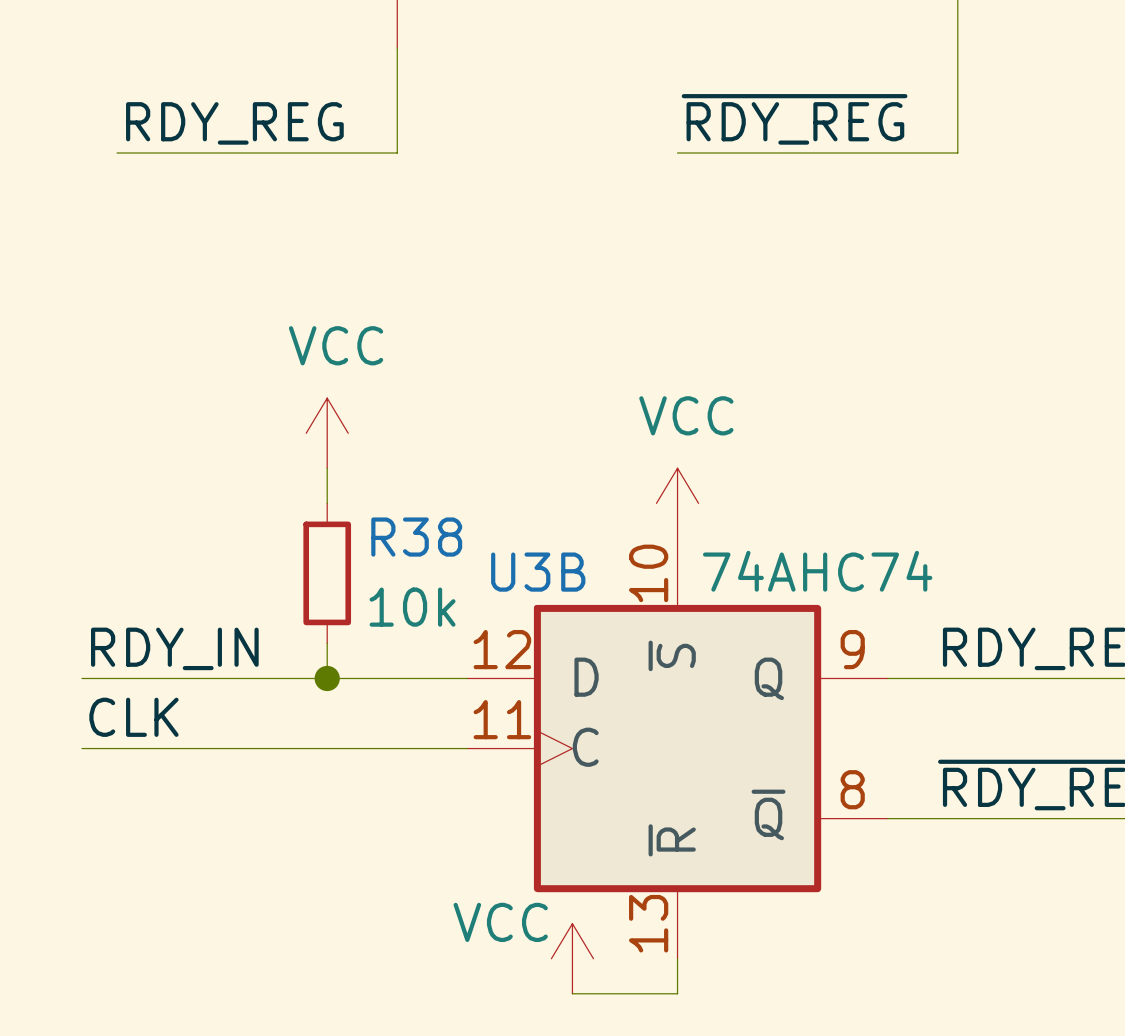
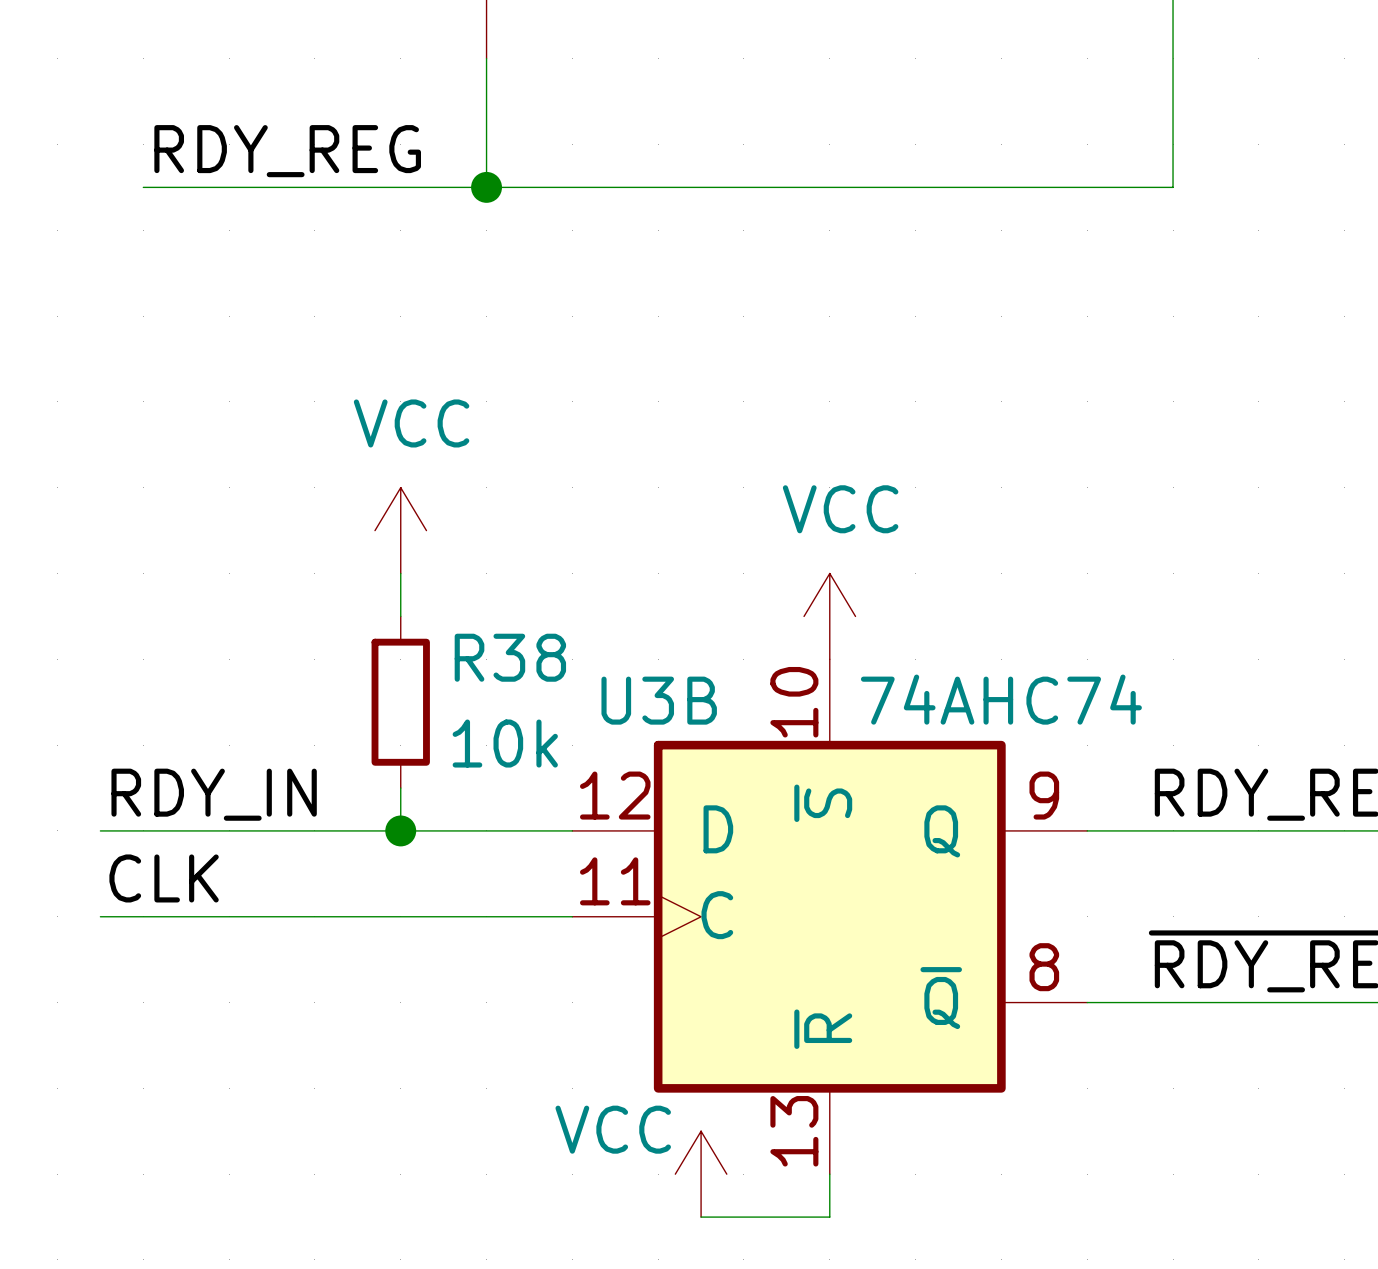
label: ~{RDY_REG} (794, 119) -> none
wire: none -> (486, 187) (829, 187)
junction: none -> (486, 187)

